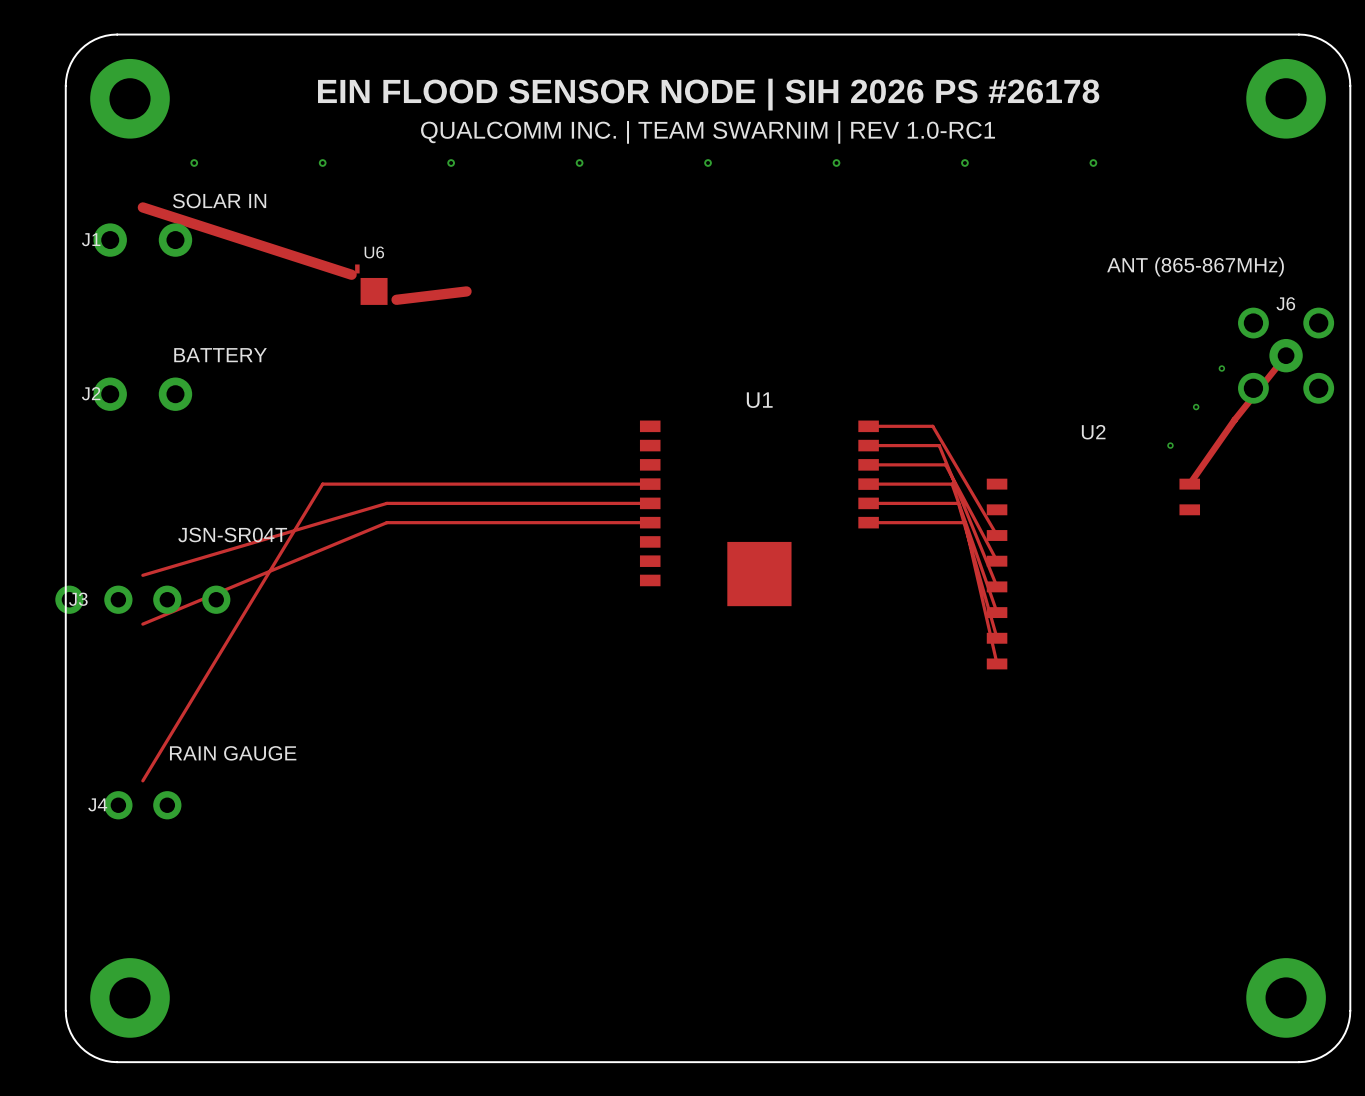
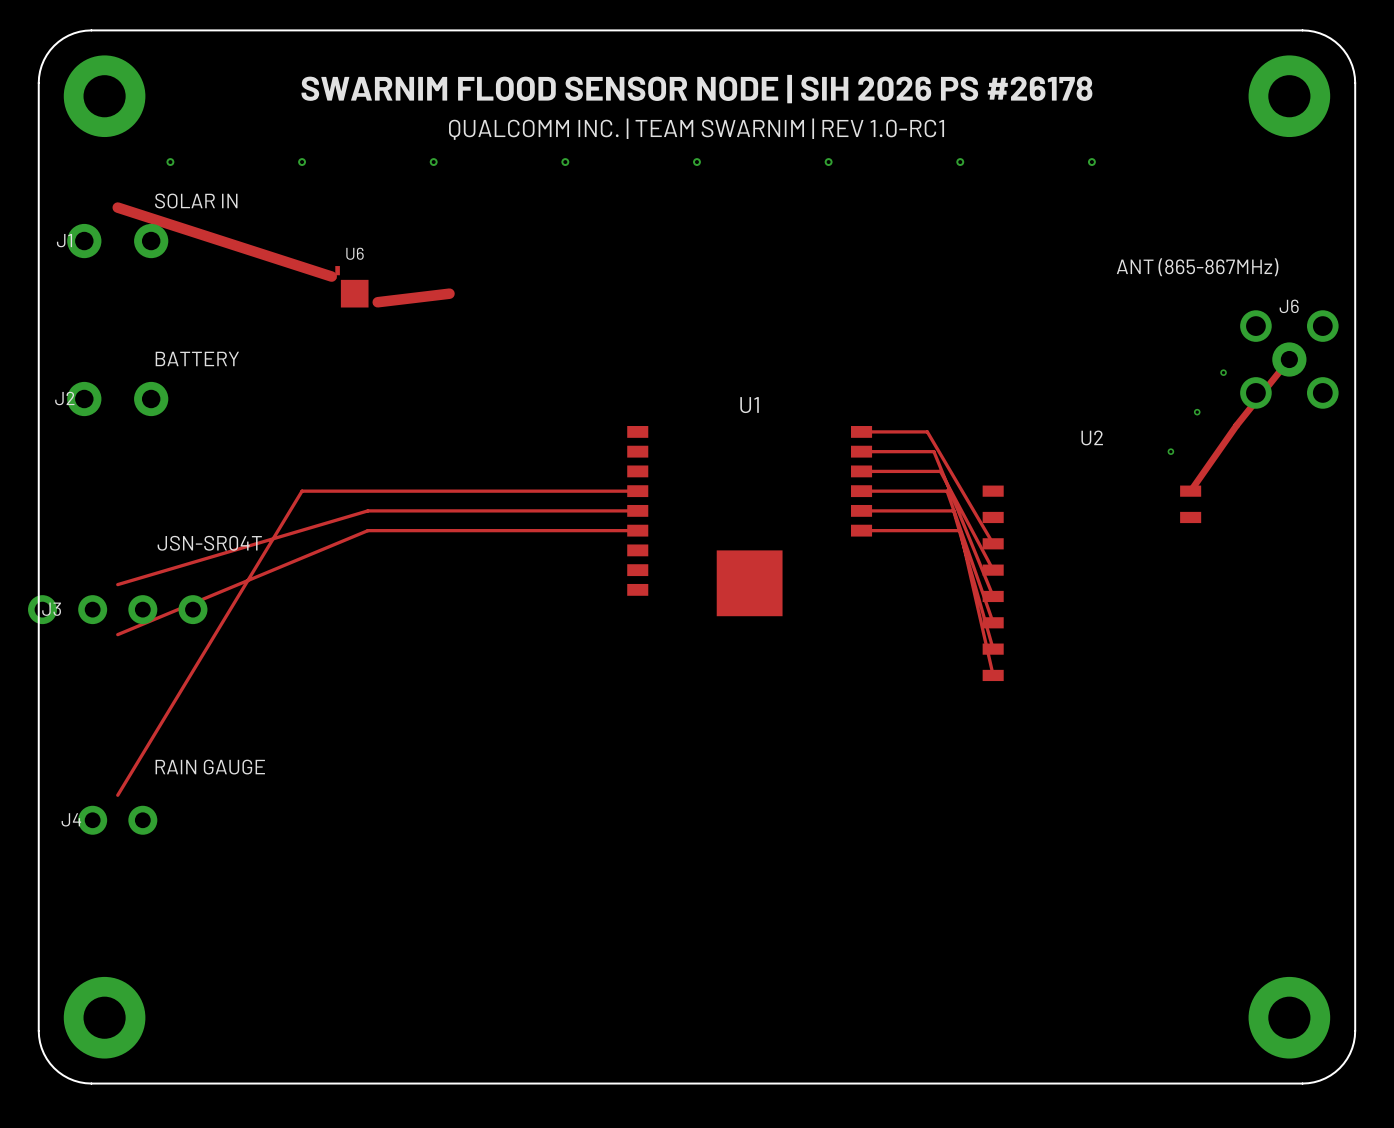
text: EIN FLOOD SENSOR NODE | SIH 2026 PS #26178 (708, 94) -> SWARNIM FLOOD SENSOR NODE | SIH 2026 PS #26178 (696, 89)

